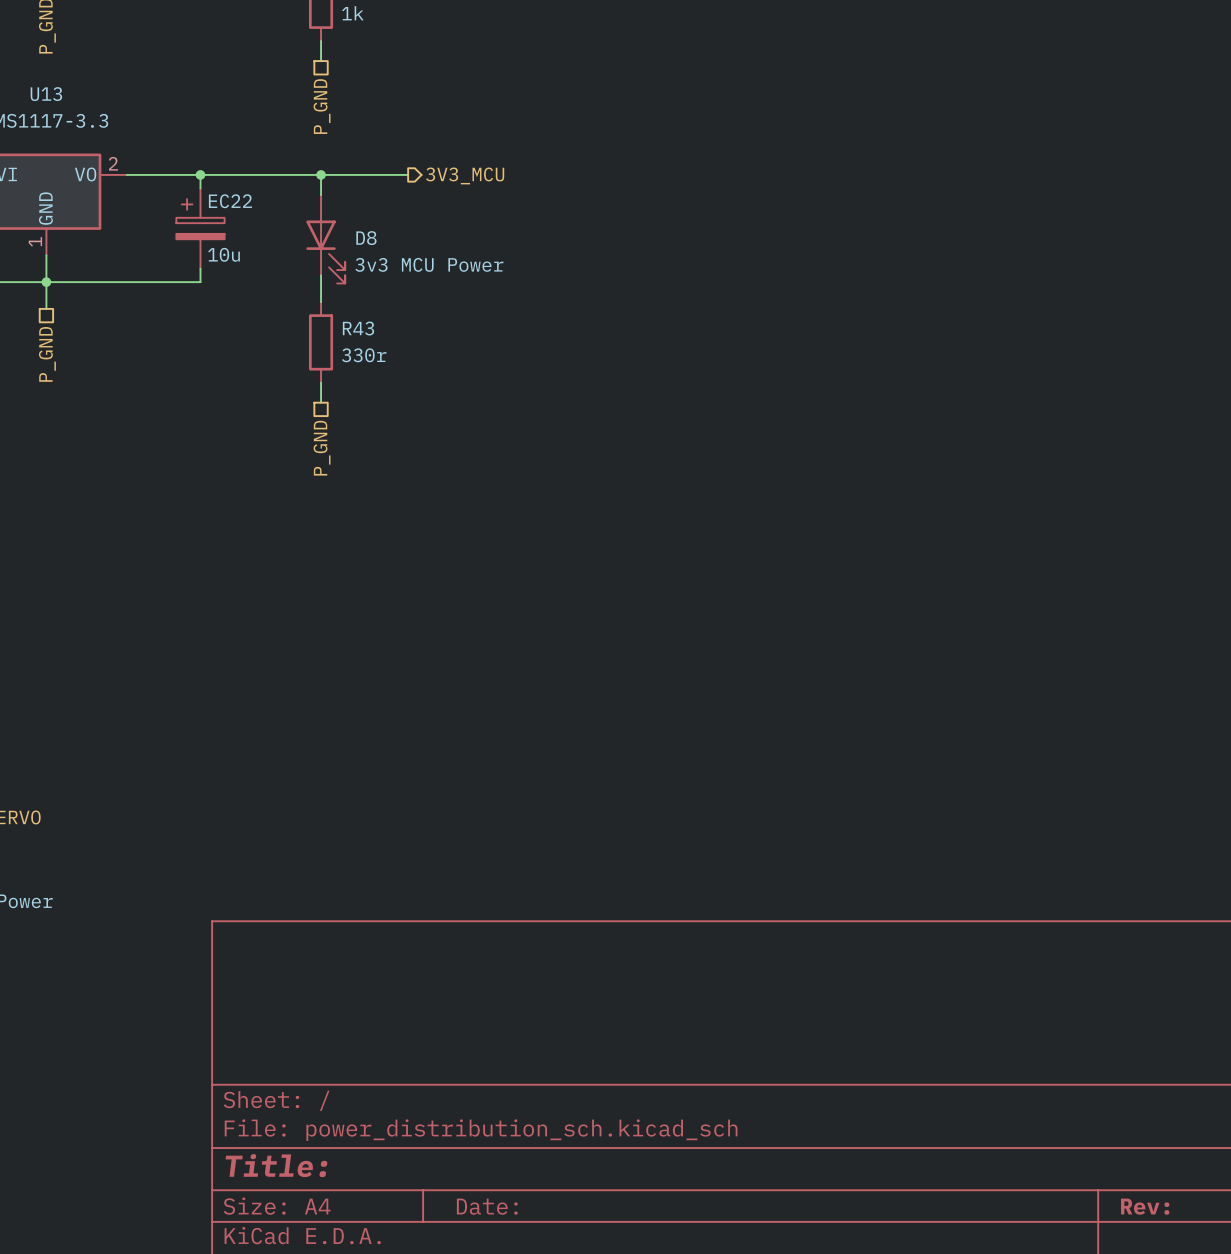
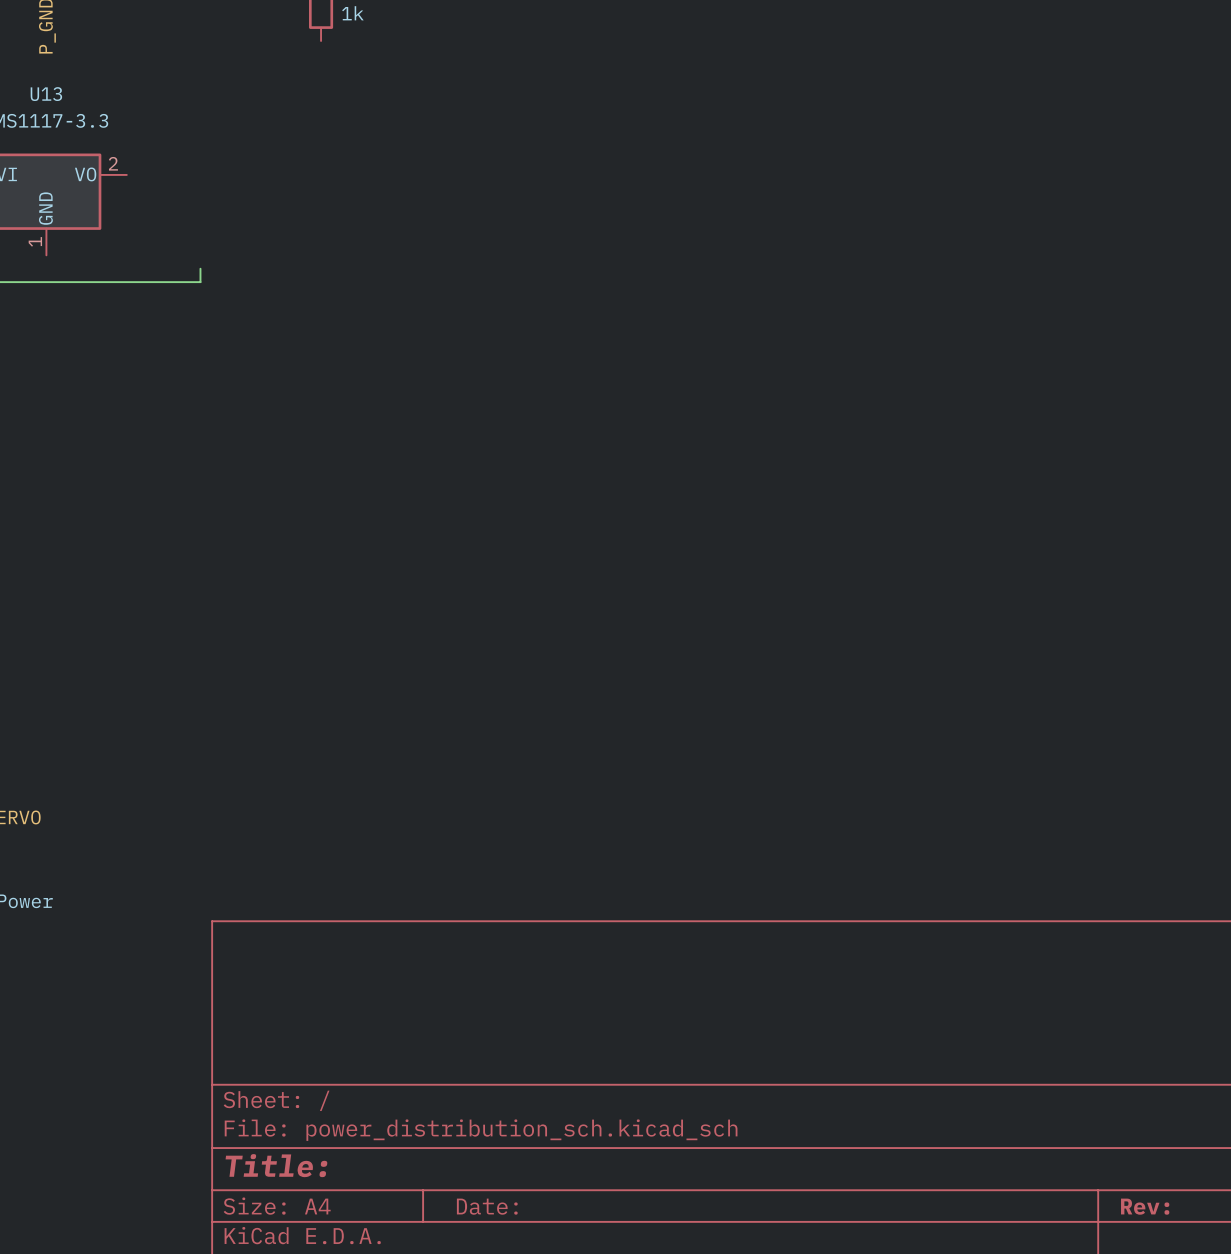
wire: (321, 40) (321, 61) -> none
hierarchical label: P_GND (322, 106) -> none
wire: (126, 174) (408, 174) -> none
wire: (200, 174) (200, 188) -> none
junction: (200, 174) -> none
wire: (321, 174) (321, 195) -> none
junction: (321, 174) -> none
hierarchical label: 3V3_MCU (465, 175) -> none
EC22: 10u (200, 228) -> none
D8: 3v3 MCU Power (325, 239) -> none
wire: (46, 255) (46, 308) -> none
wire: (321, 275) (321, 302) -> none
junction: (46, 282) -> none
R43: 330r (321, 342) -> none
hierarchical label: P_GND (47, 354) -> none
wire: (321, 382) (321, 402) -> none
hierarchical label: P_GND (322, 448) -> none

